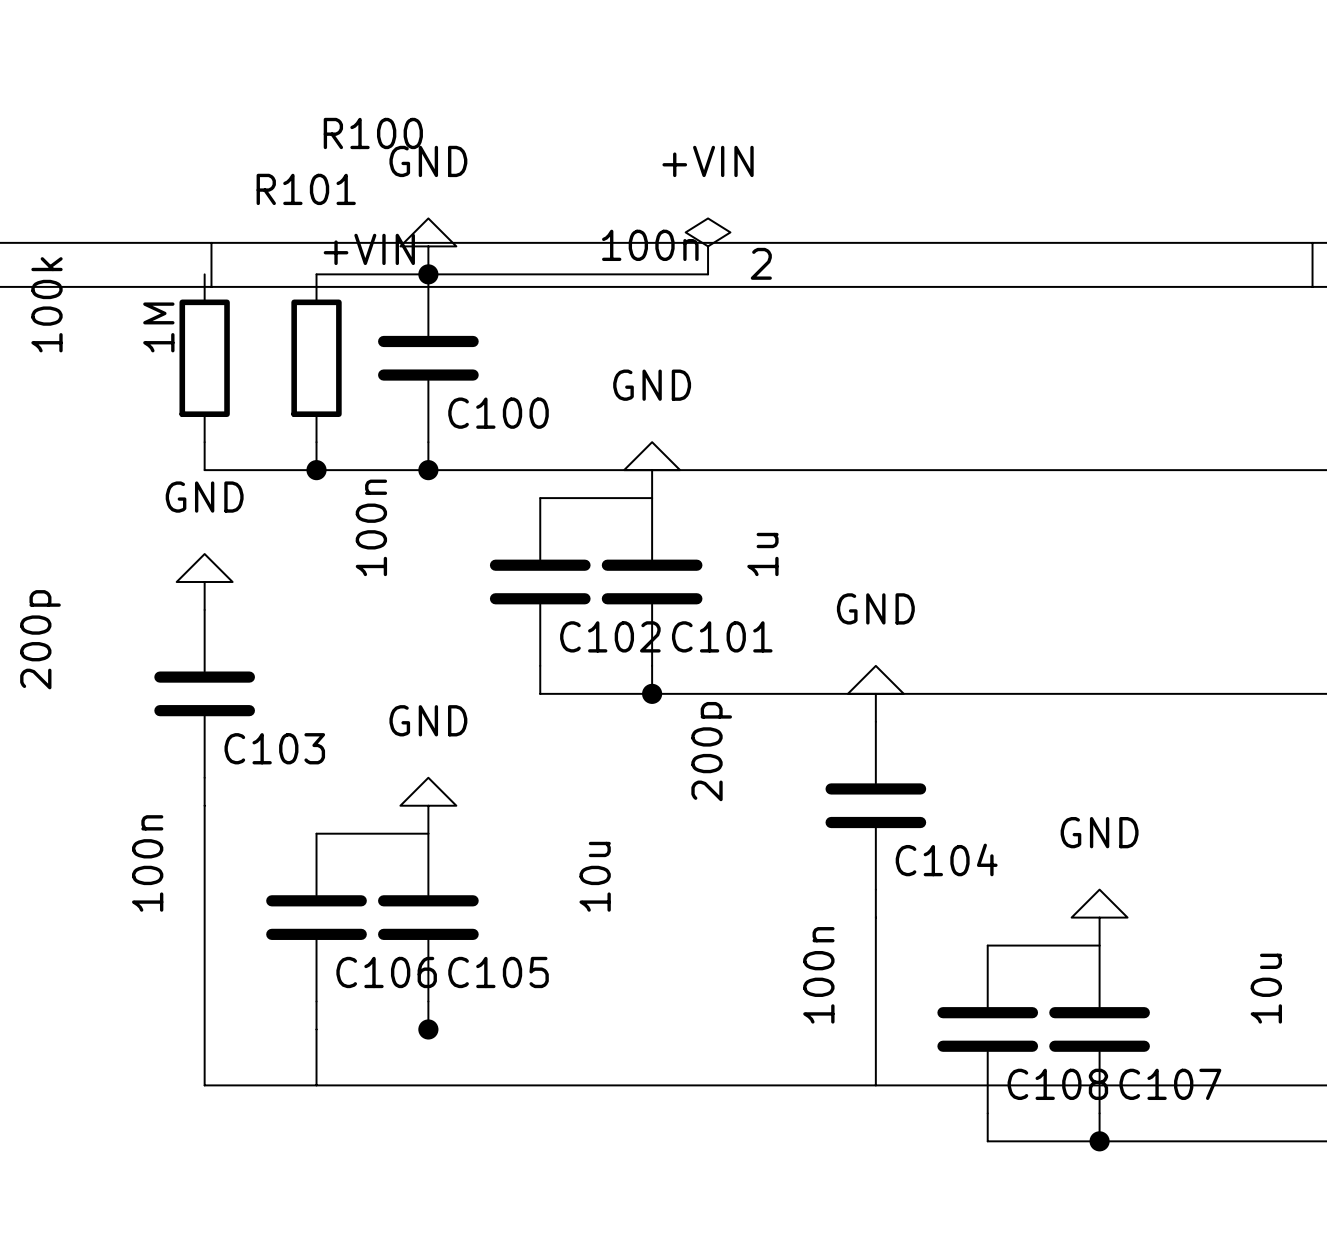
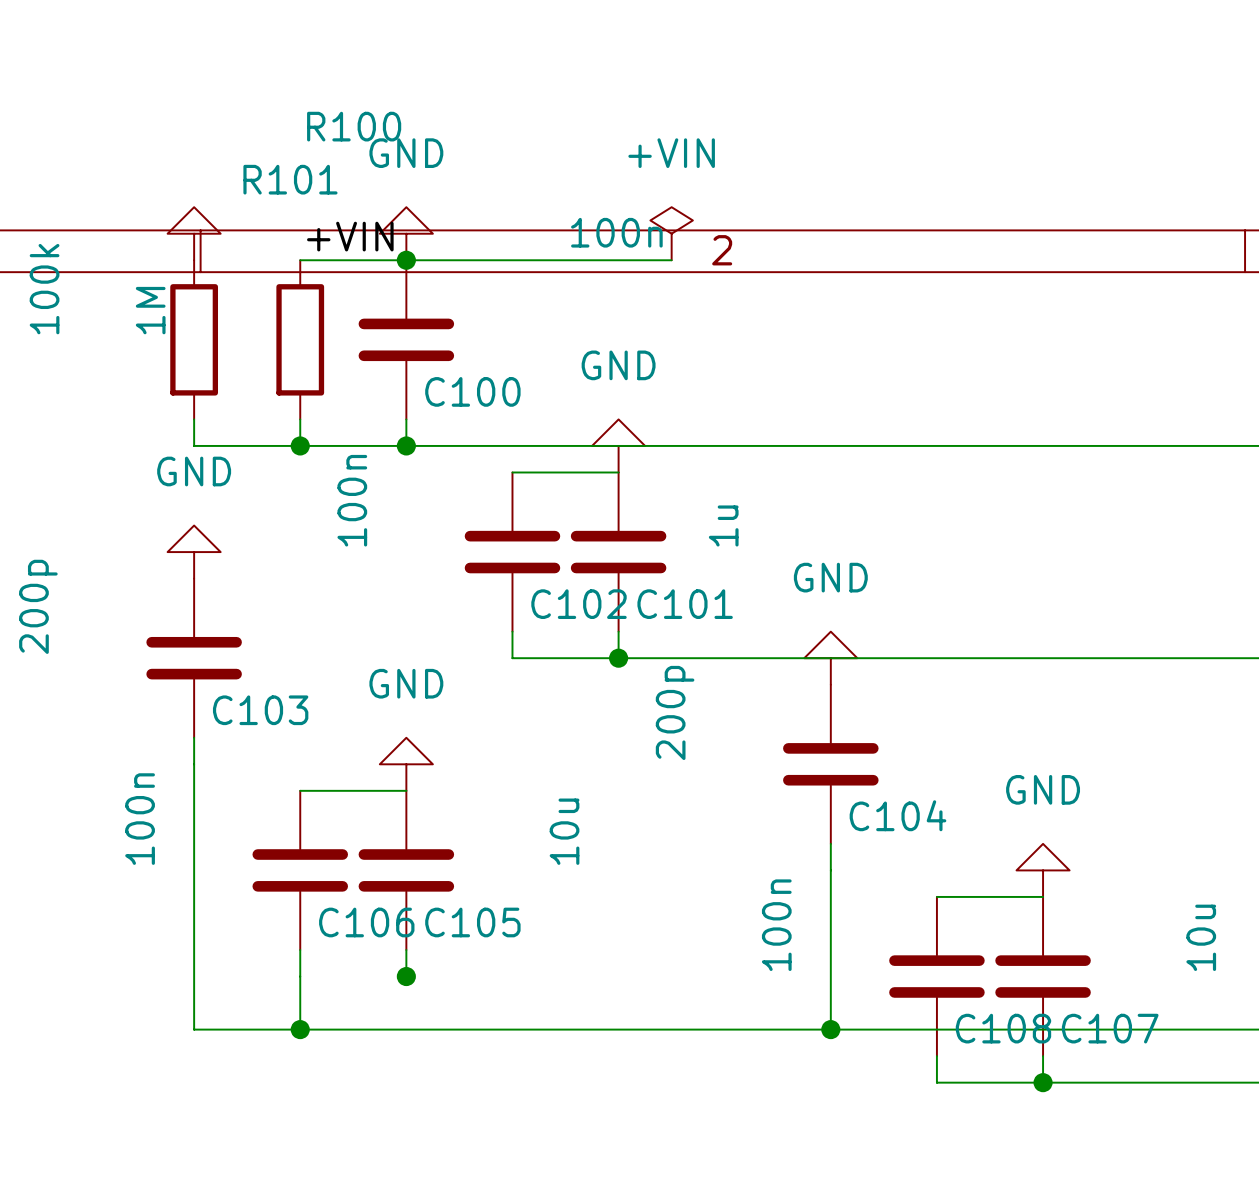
power symbol: none -> (194, 233)
junction: none -> (300, 1029)
junction: none -> (830, 1029)

